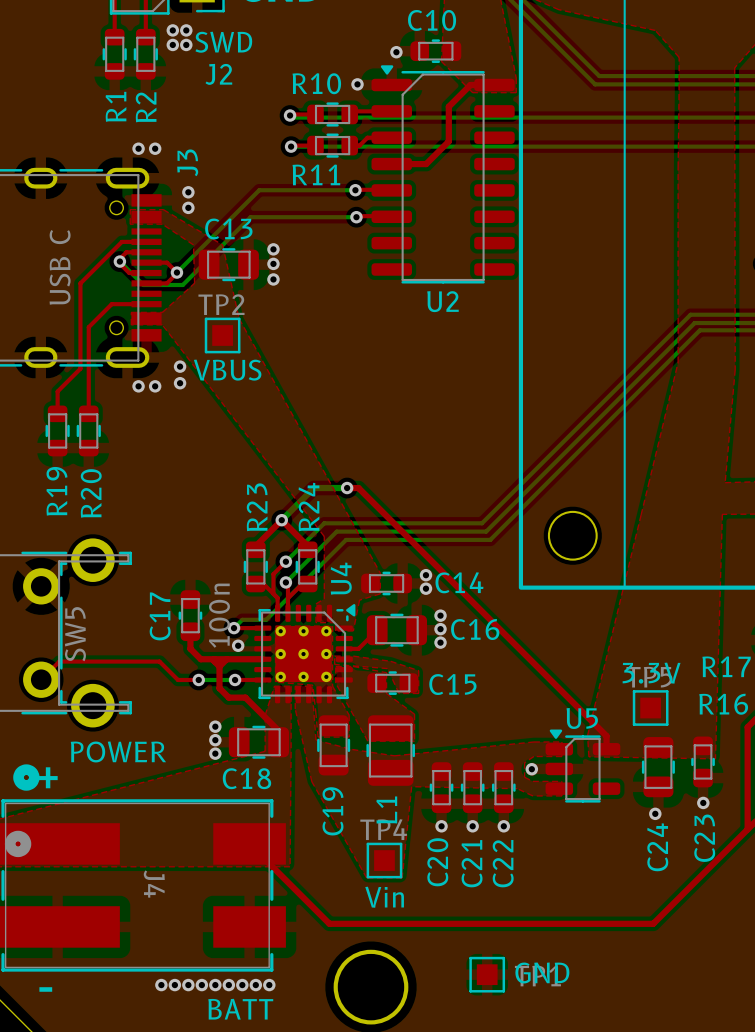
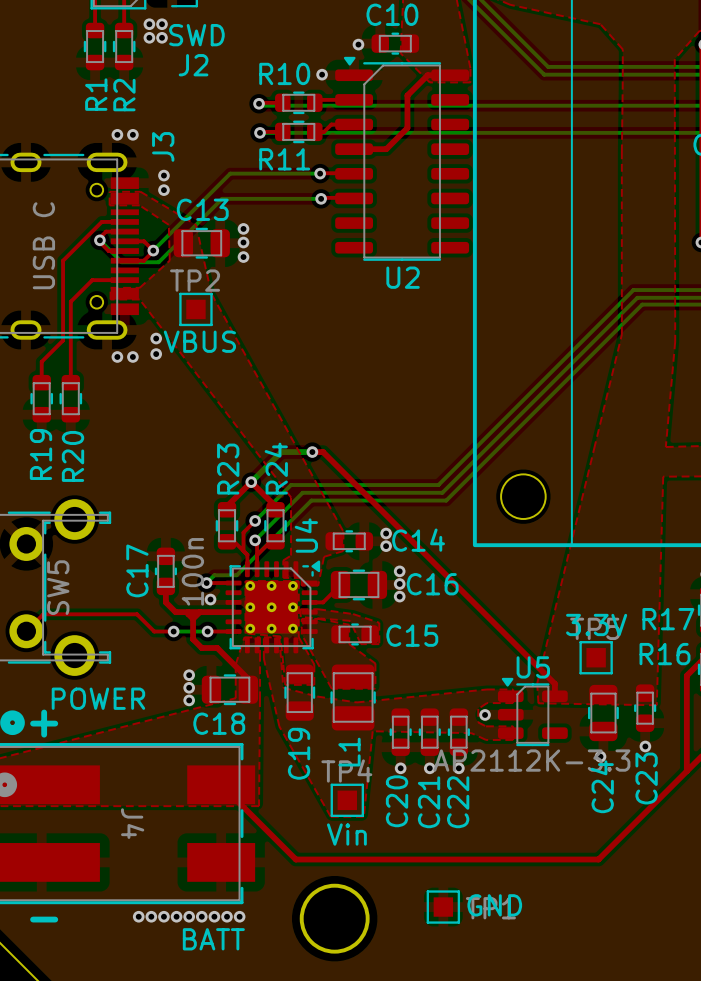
U5 value: none -> AP2112K-3.3 (531, 760)

